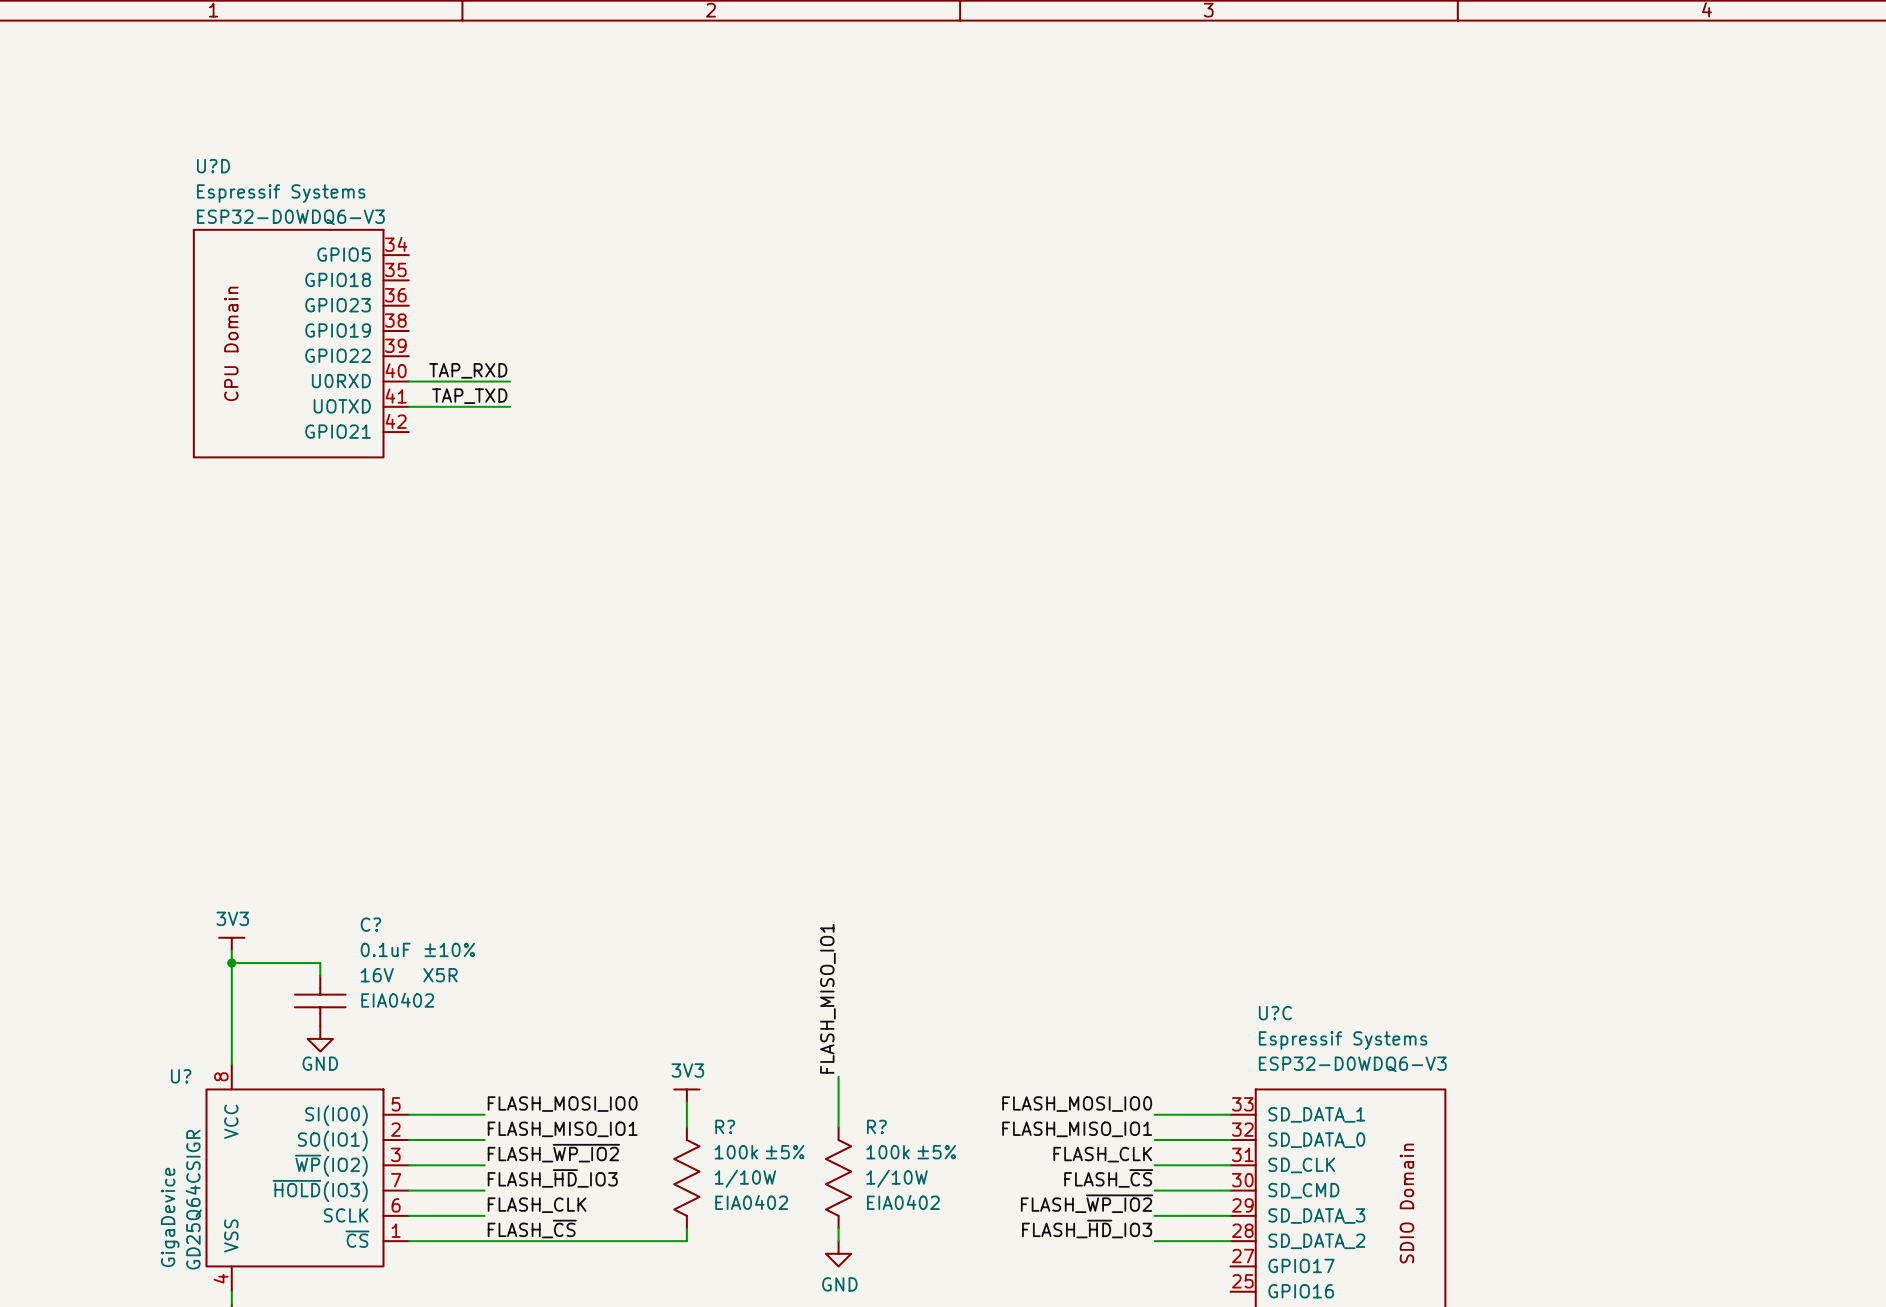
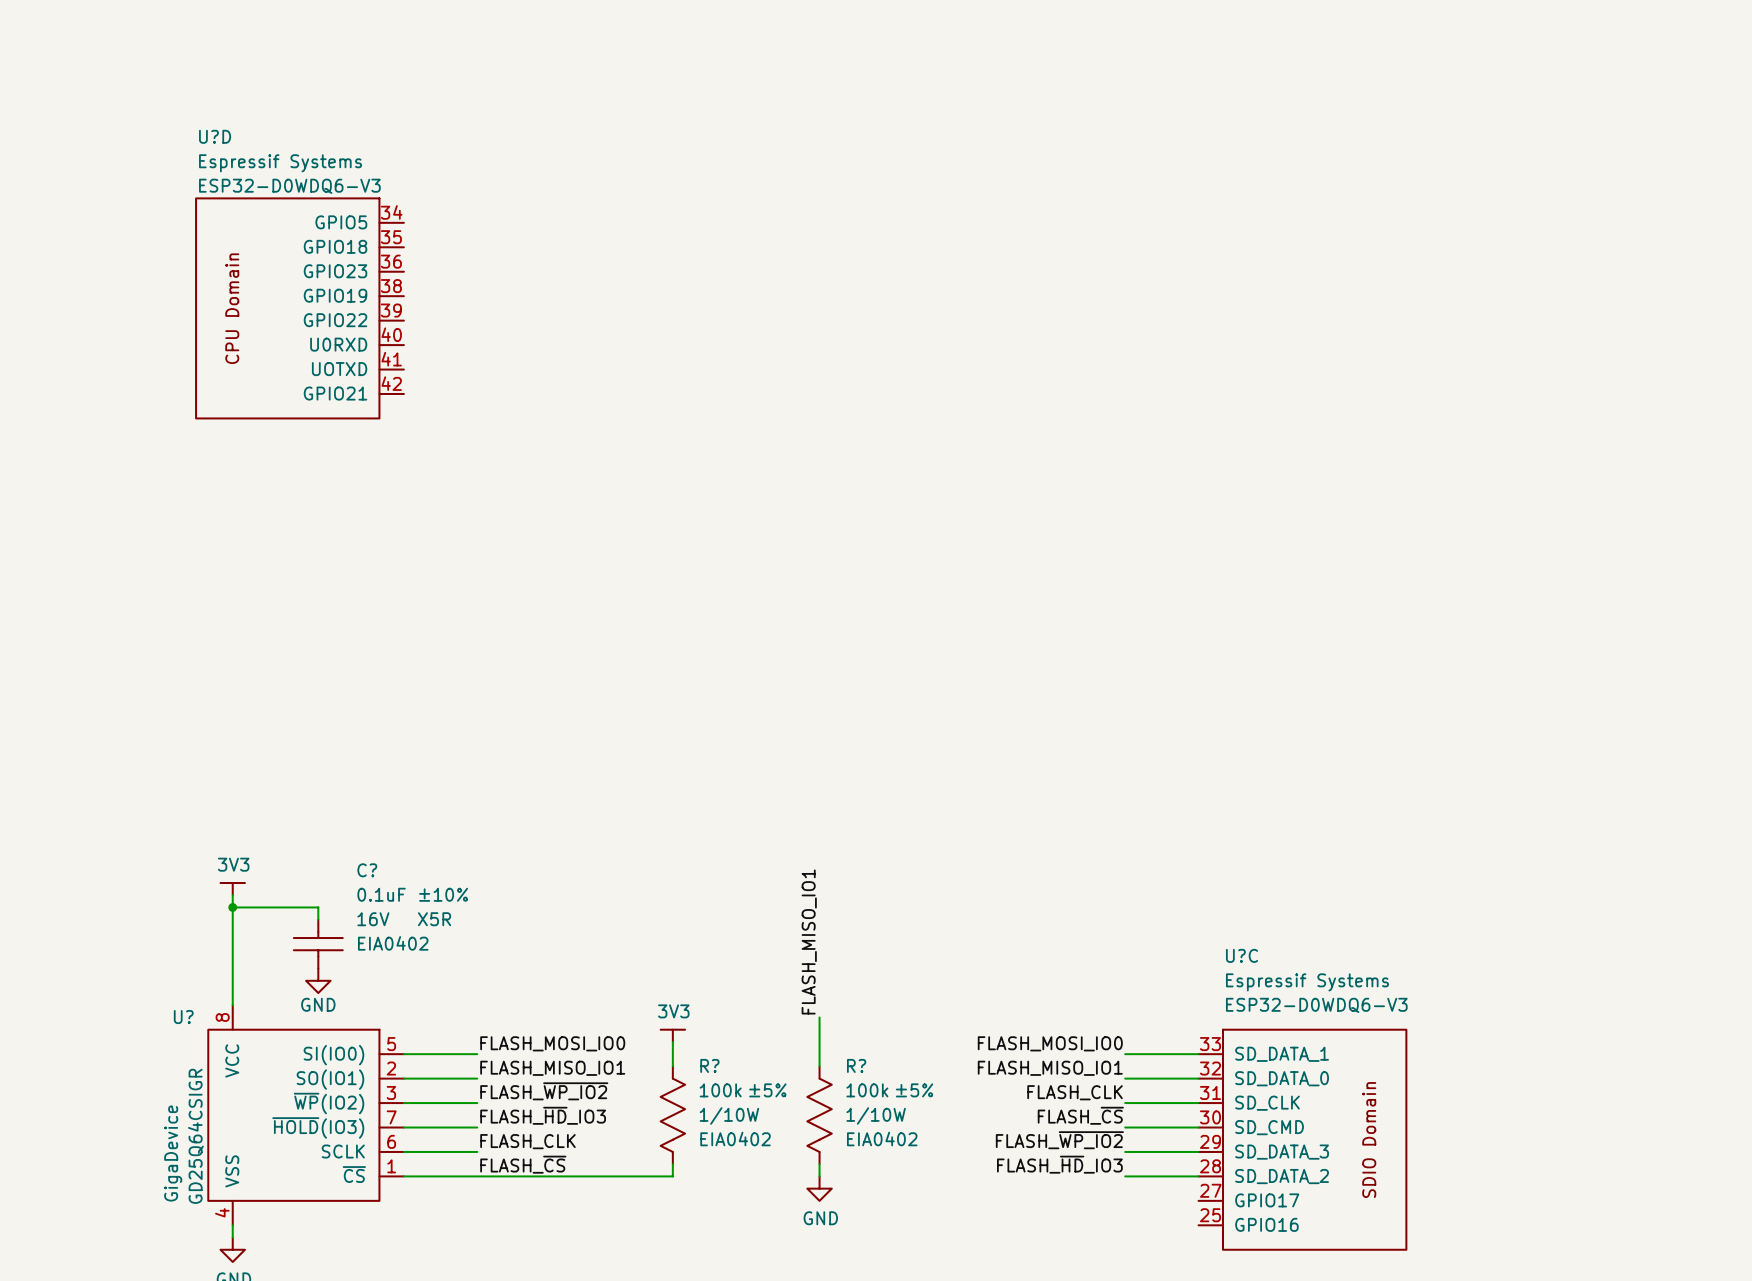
label: TAP_RXD (468, 370) -> none
wire: (408, 381) (509, 381) -> none
label: TAP_TXD (469, 396) -> none
wire: (408, 406) (509, 406) -> none

